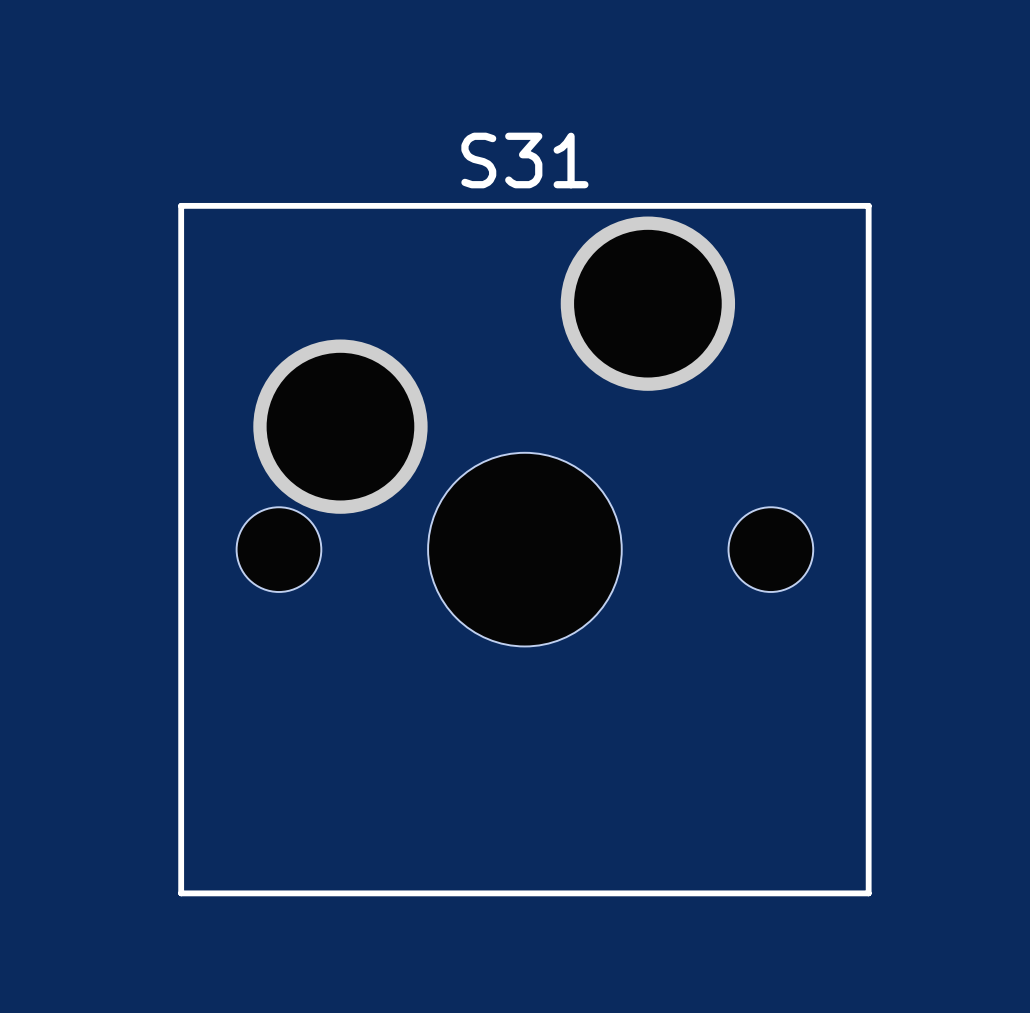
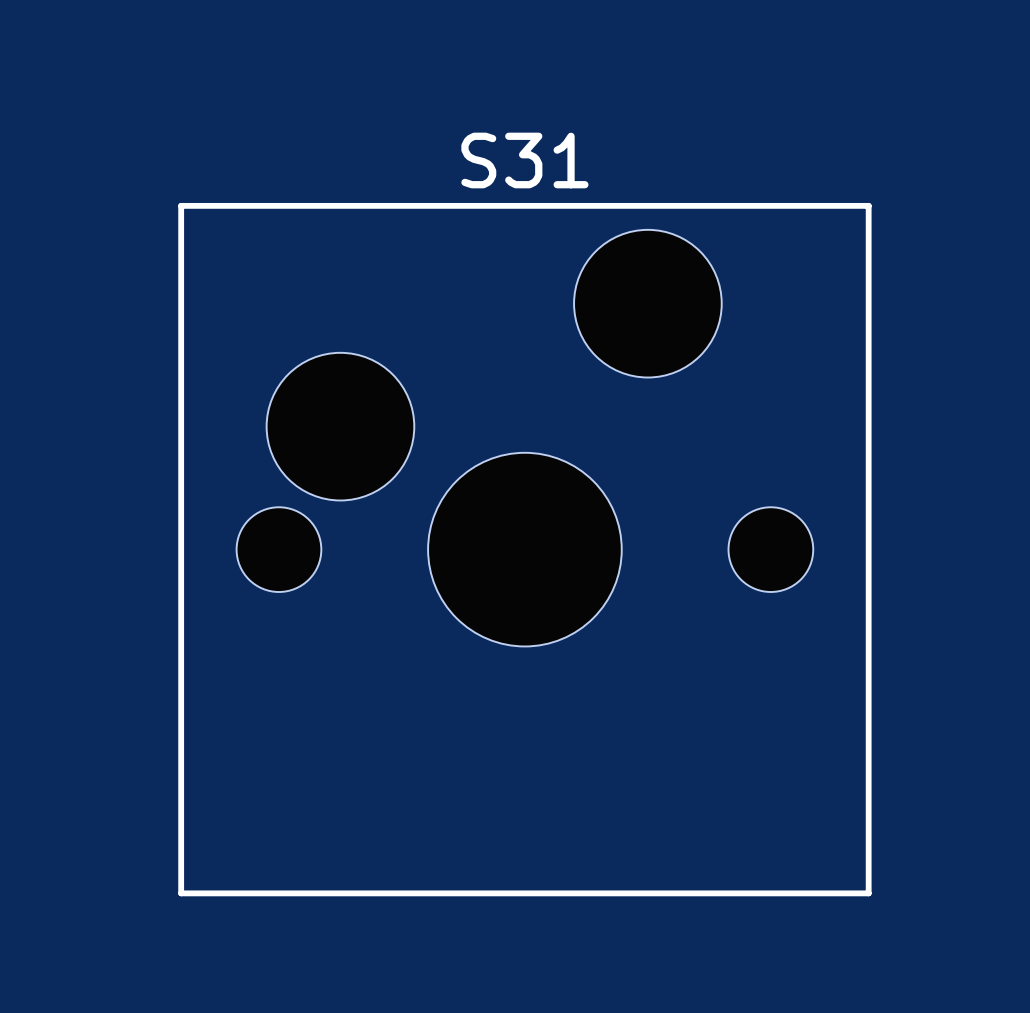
S31 footprint: [178, 202, 872, 897] -> [178, 202, 872, 897]

